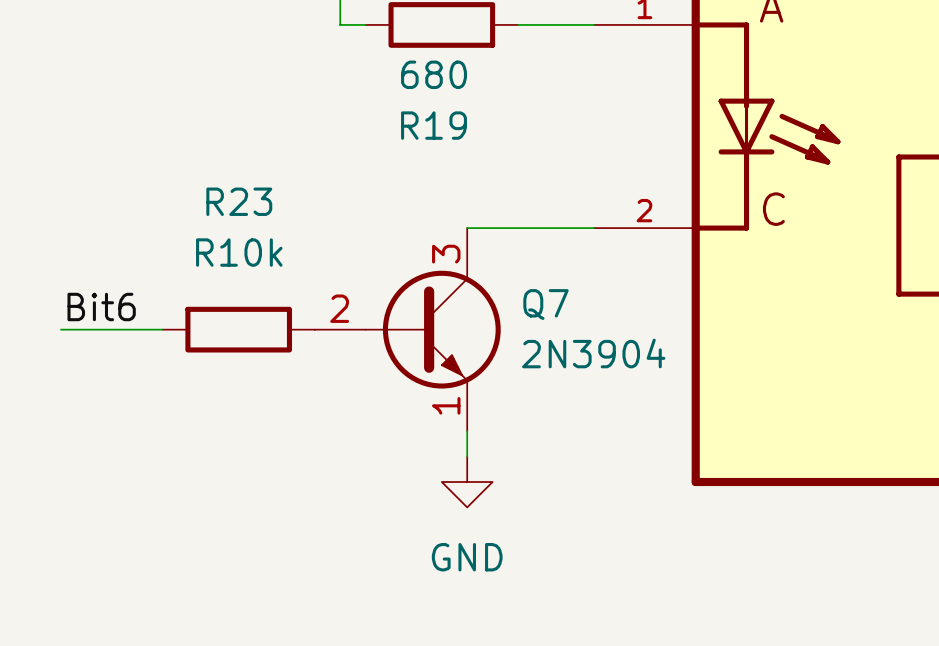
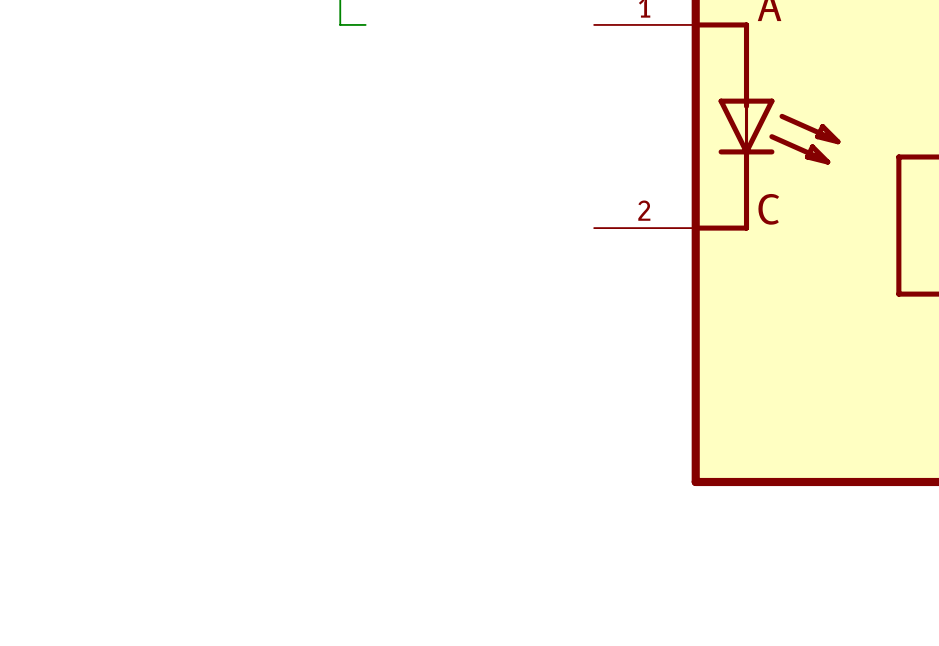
R19: 680 (441, 24) -> none
wire: (517, 24) (594, 24) -> none
wire: (467, 228) (594, 228) -> none
label: Bit6 (101, 306) -> none
wire: (60, 329) (162, 329) -> none
R23: R10k (238, 329) -> none
Q7: 2N3904 (407, 329) -> none
wire: (467, 431) (467, 456) -> none
power symbol: GND (467, 482) -> none

